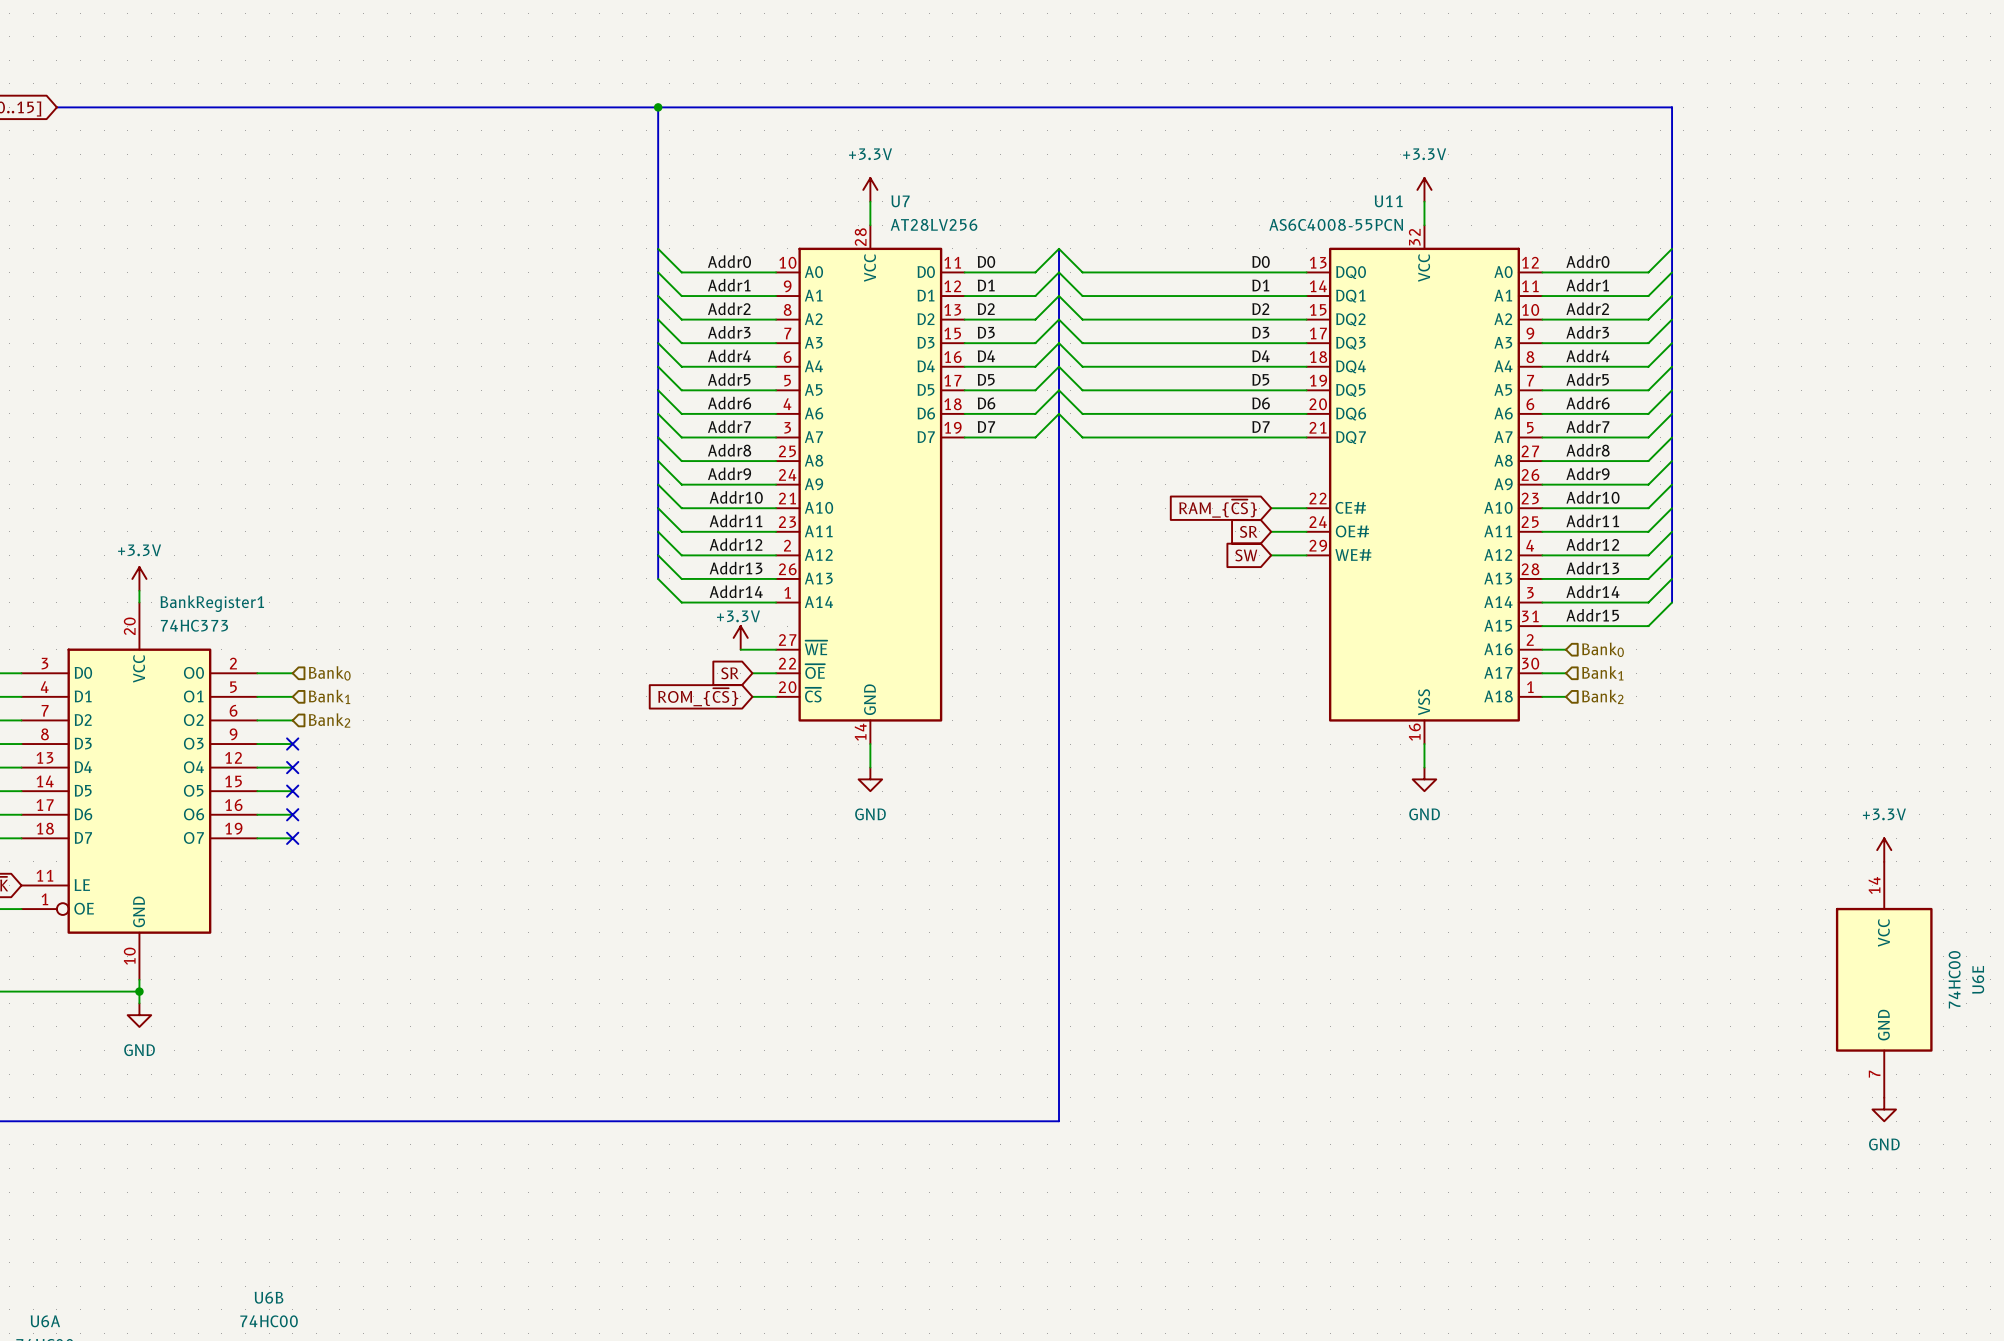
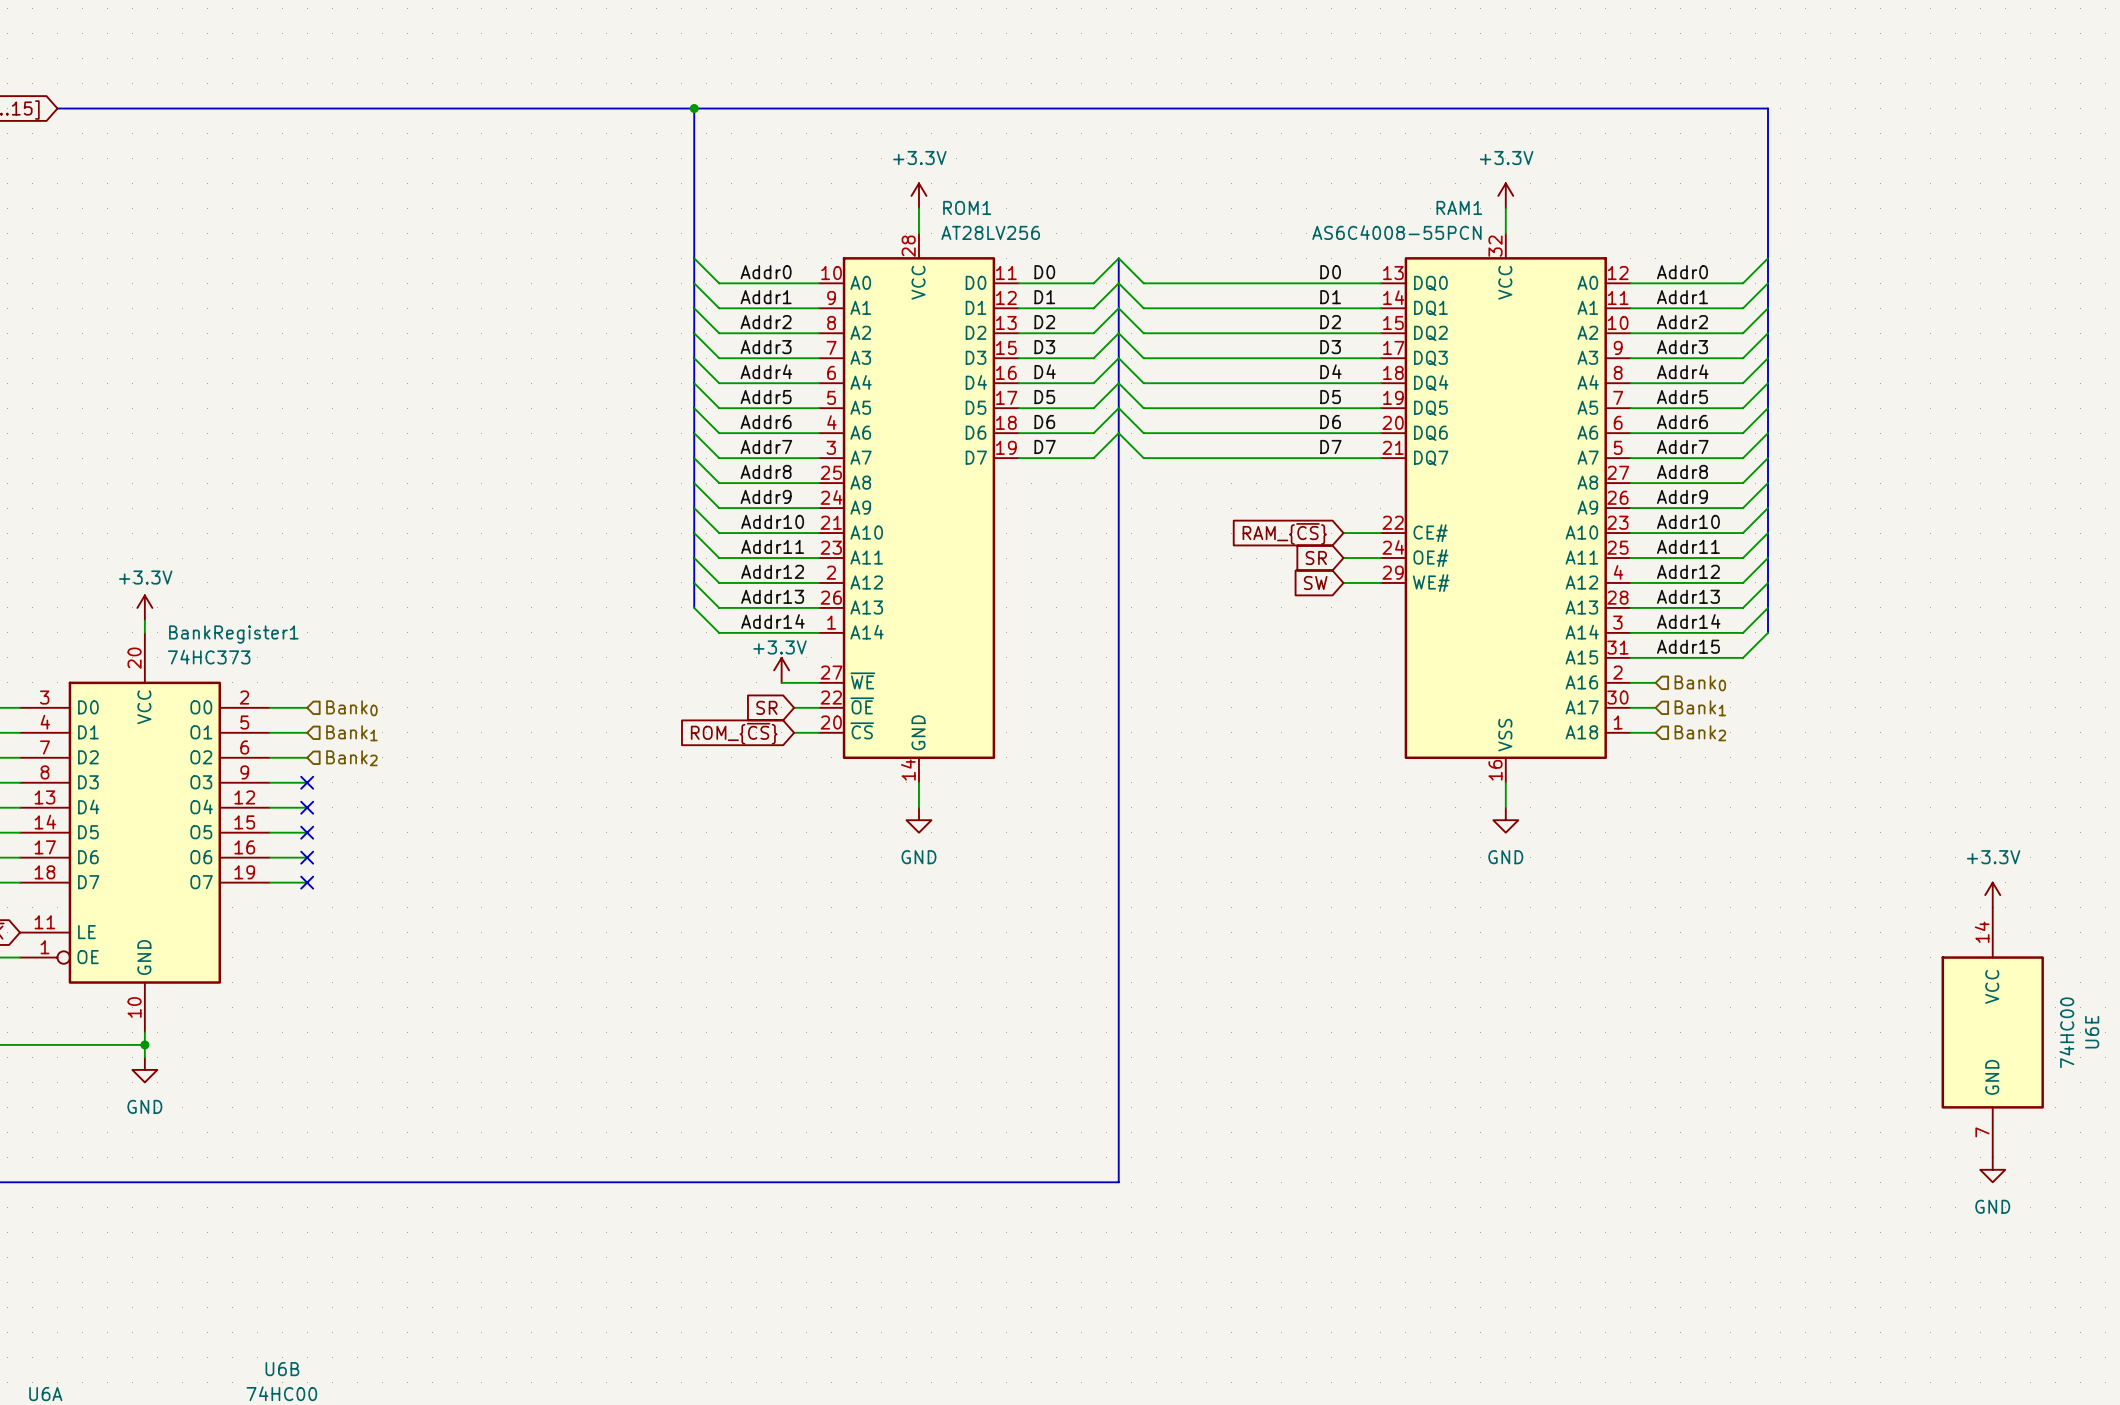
U7 name: U7 (900, 201) -> ROM1 (967, 207)
U11 name: U11 (1388, 201) -> RAM1 (1459, 207)

